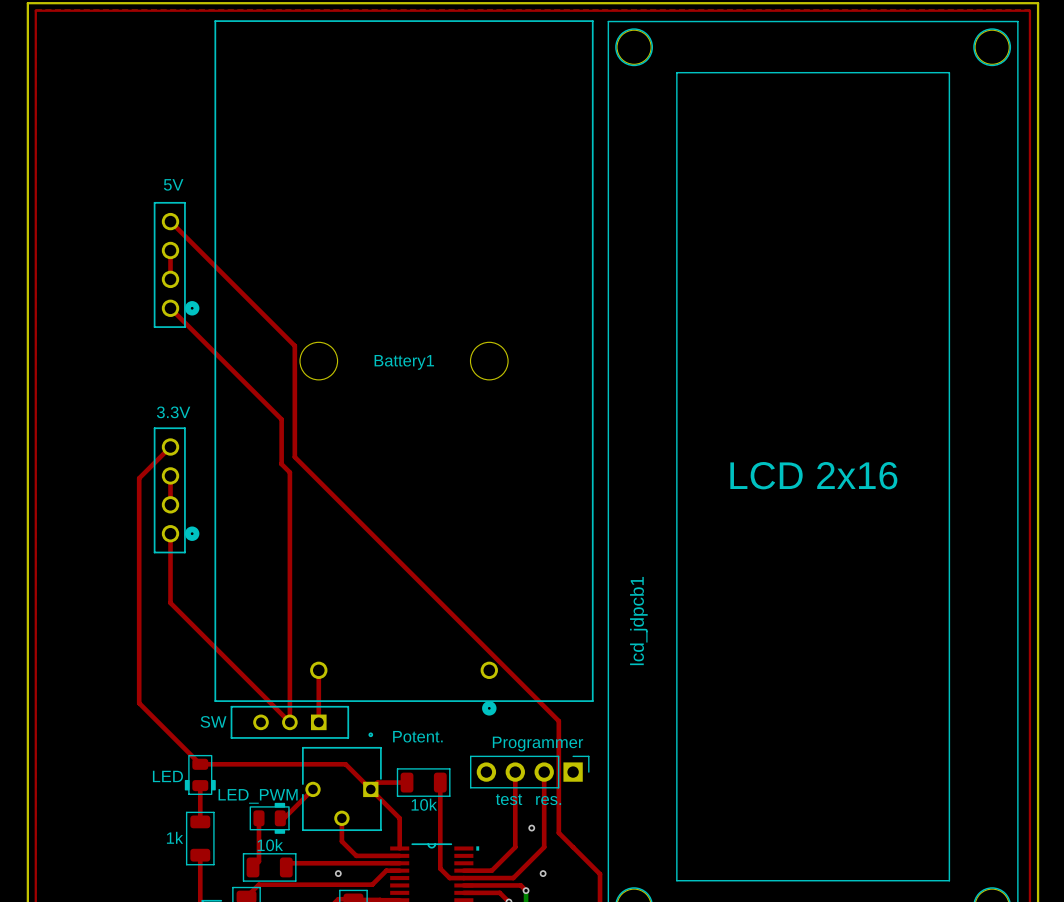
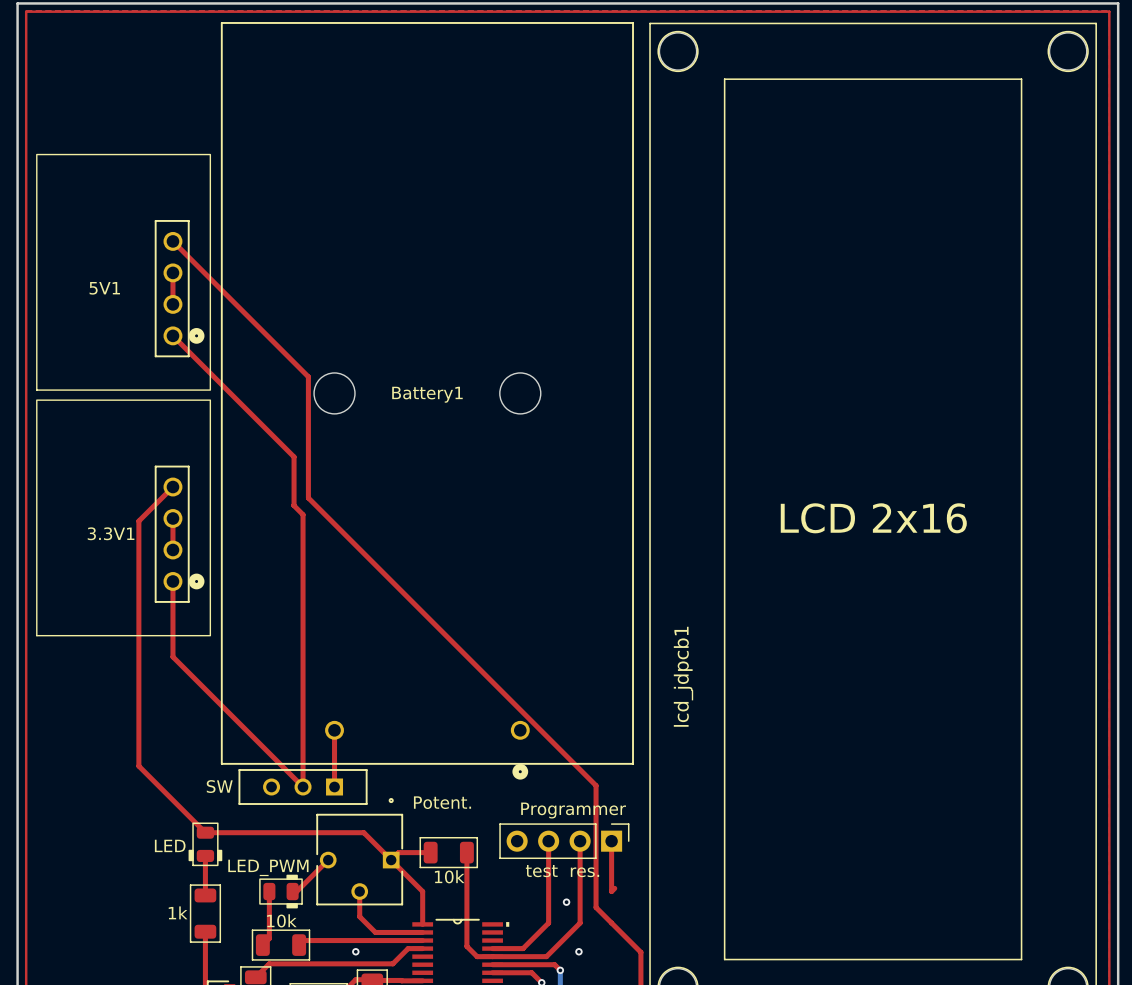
text: 5V (173, 184) -> none
5V1: none -> (123, 272)
text: 3.3V (173, 412) -> none
3.3V1: none -> (123, 517)
top track: none -> (611, 841) (611, 891) (614, 888)

